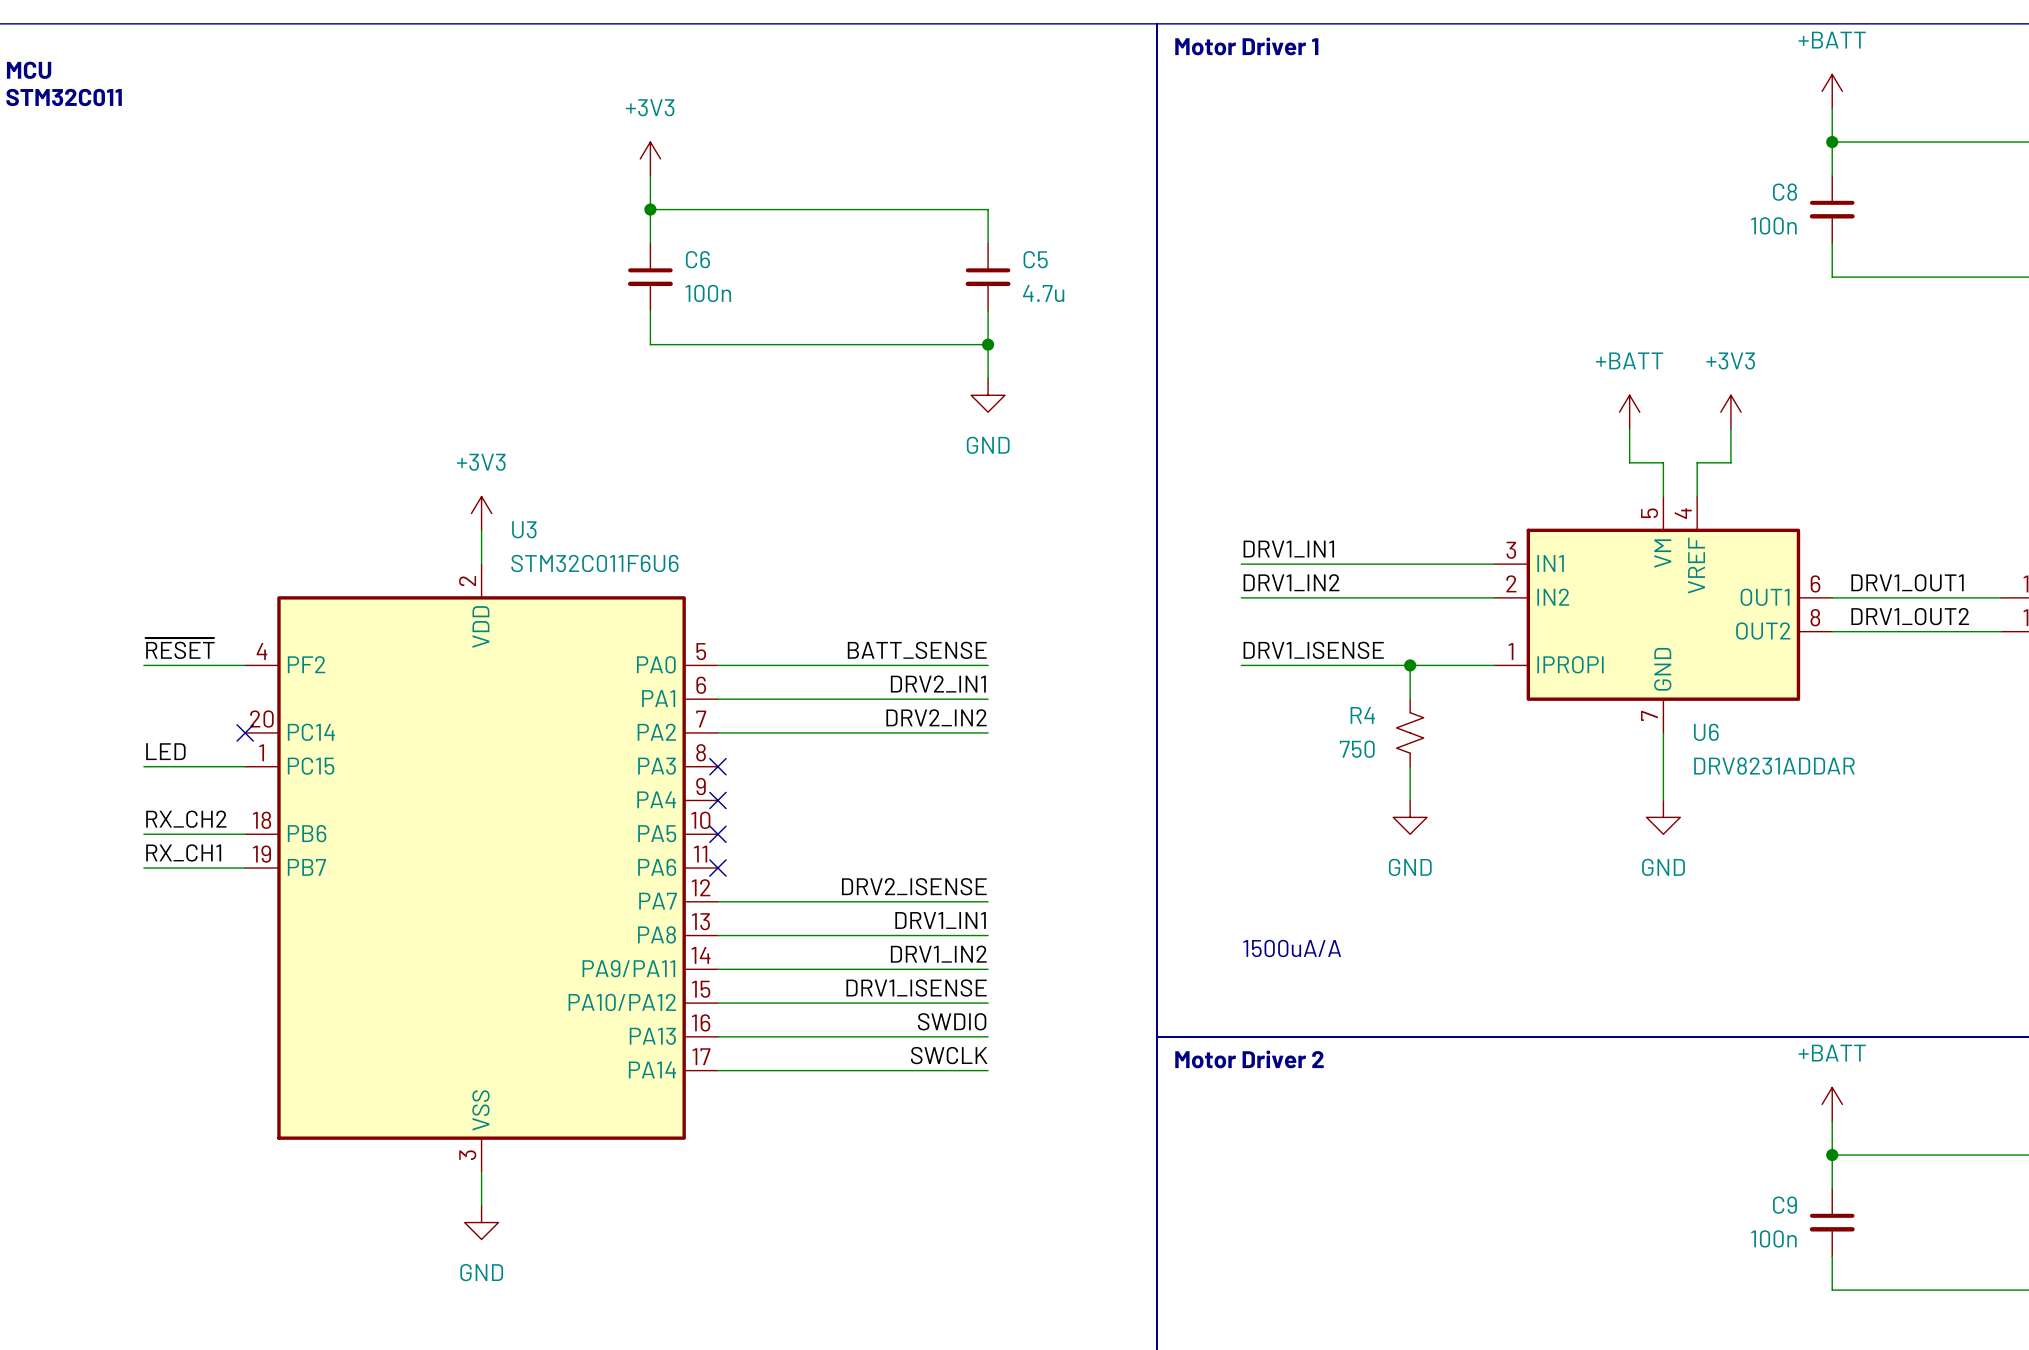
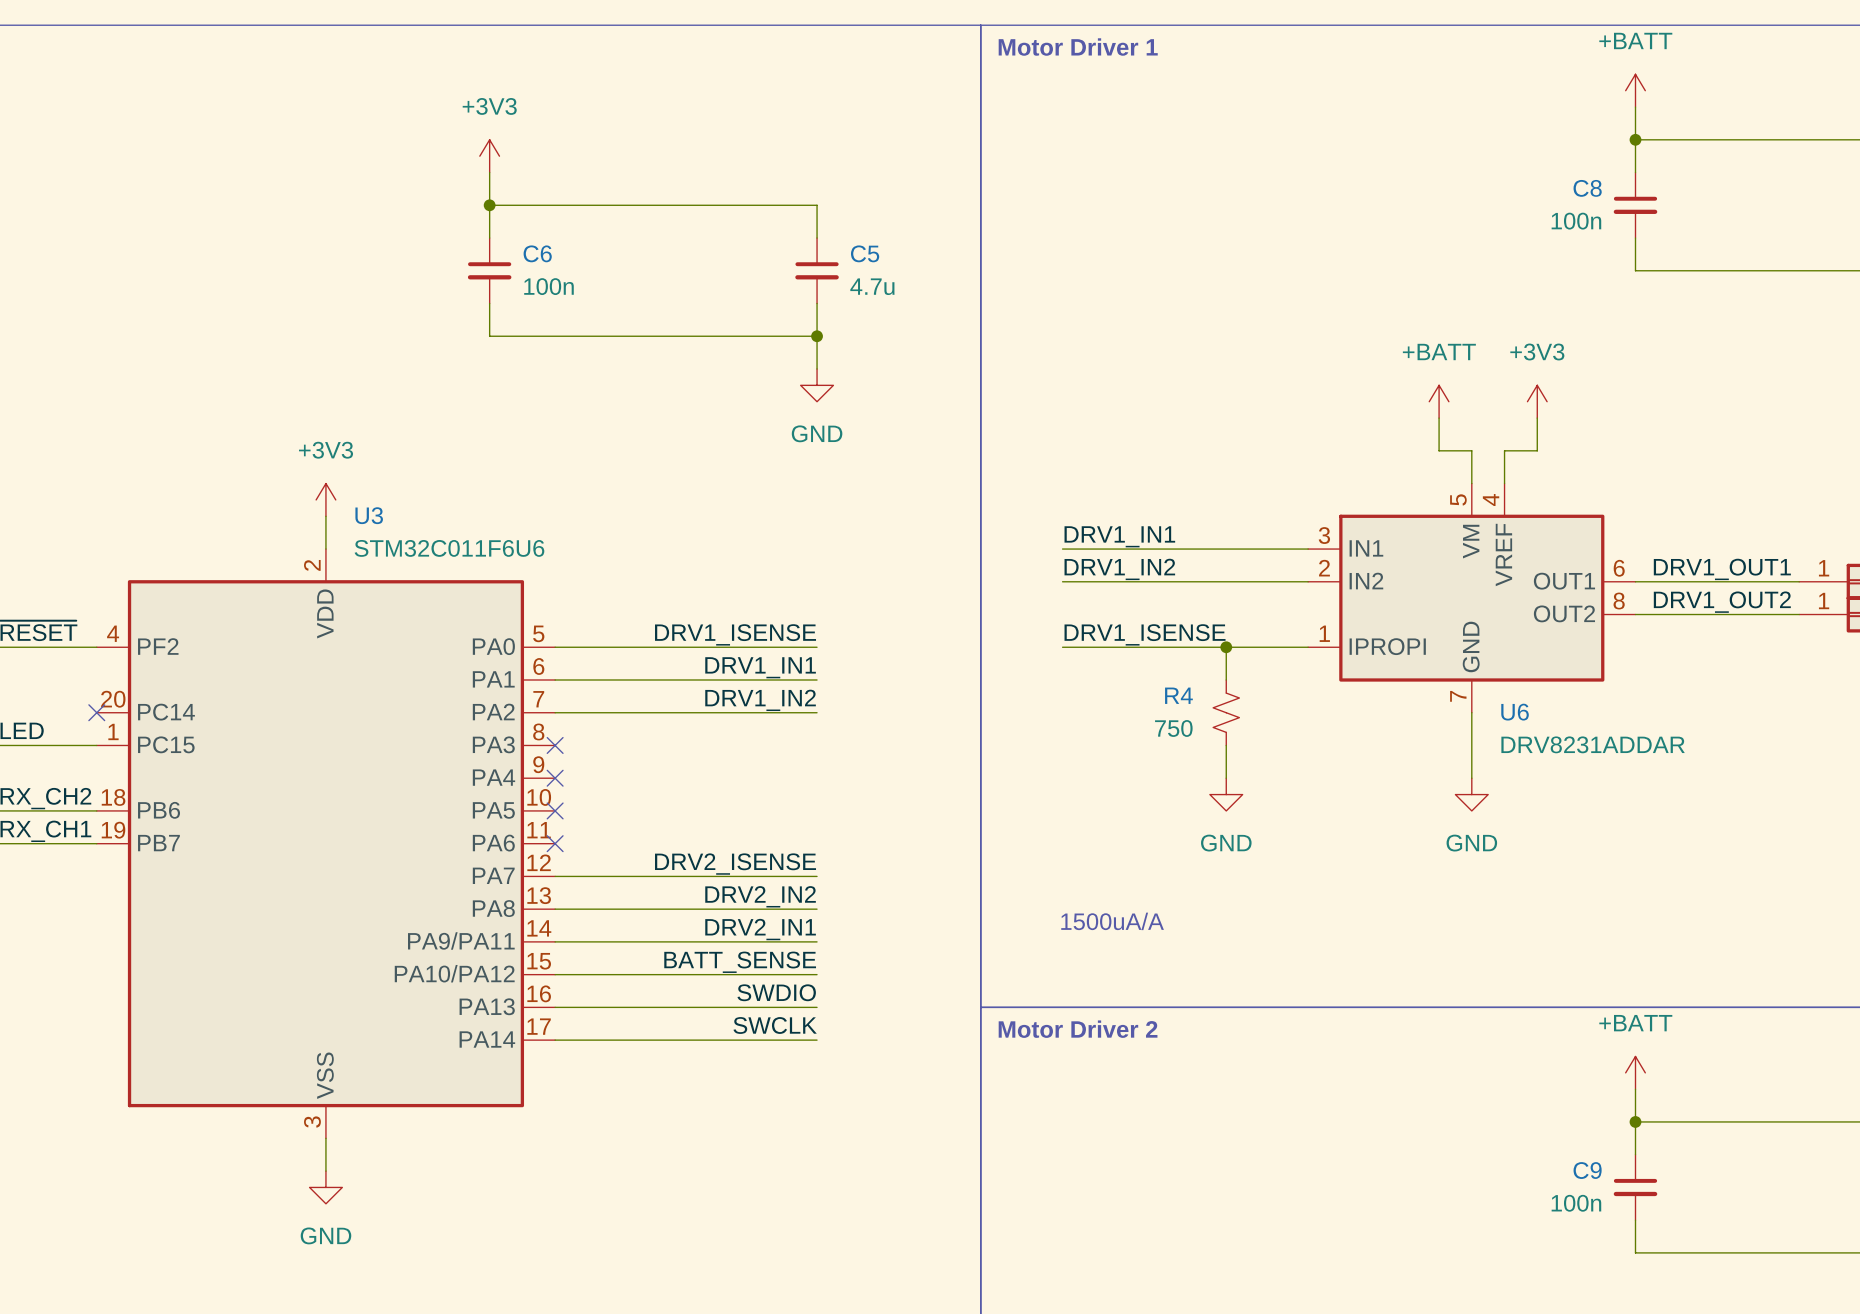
label: BATT_SENSE (917, 650) -> DRV1_ISENSE (735, 634)
label: DRV2_IN1 (938, 684) -> DRV1_IN1 (760, 667)
label: DRV2_IN2 (936, 717) -> DRV1_IN2 (760, 700)
label: DRV1_IN1 (940, 920) -> DRV2_IN2 (760, 896)
label: DRV1_IN2 (938, 954) -> DRV2_IN1 (760, 929)
label: DRV1_ISENSE (916, 988) -> BATT_SENSE (740, 962)

